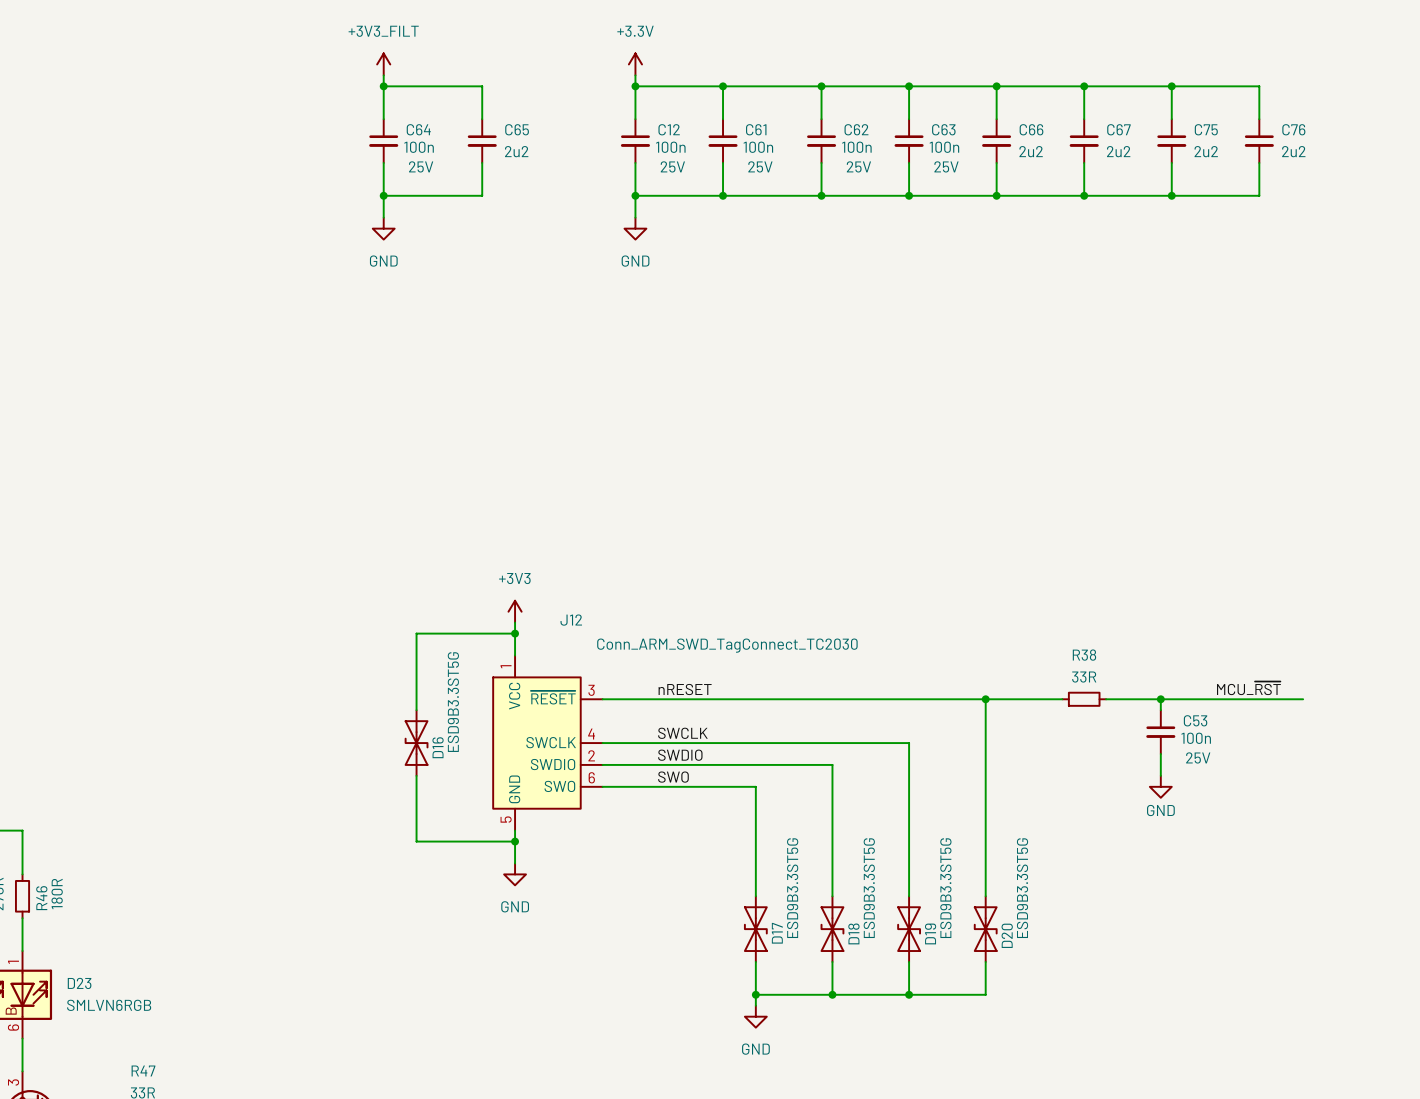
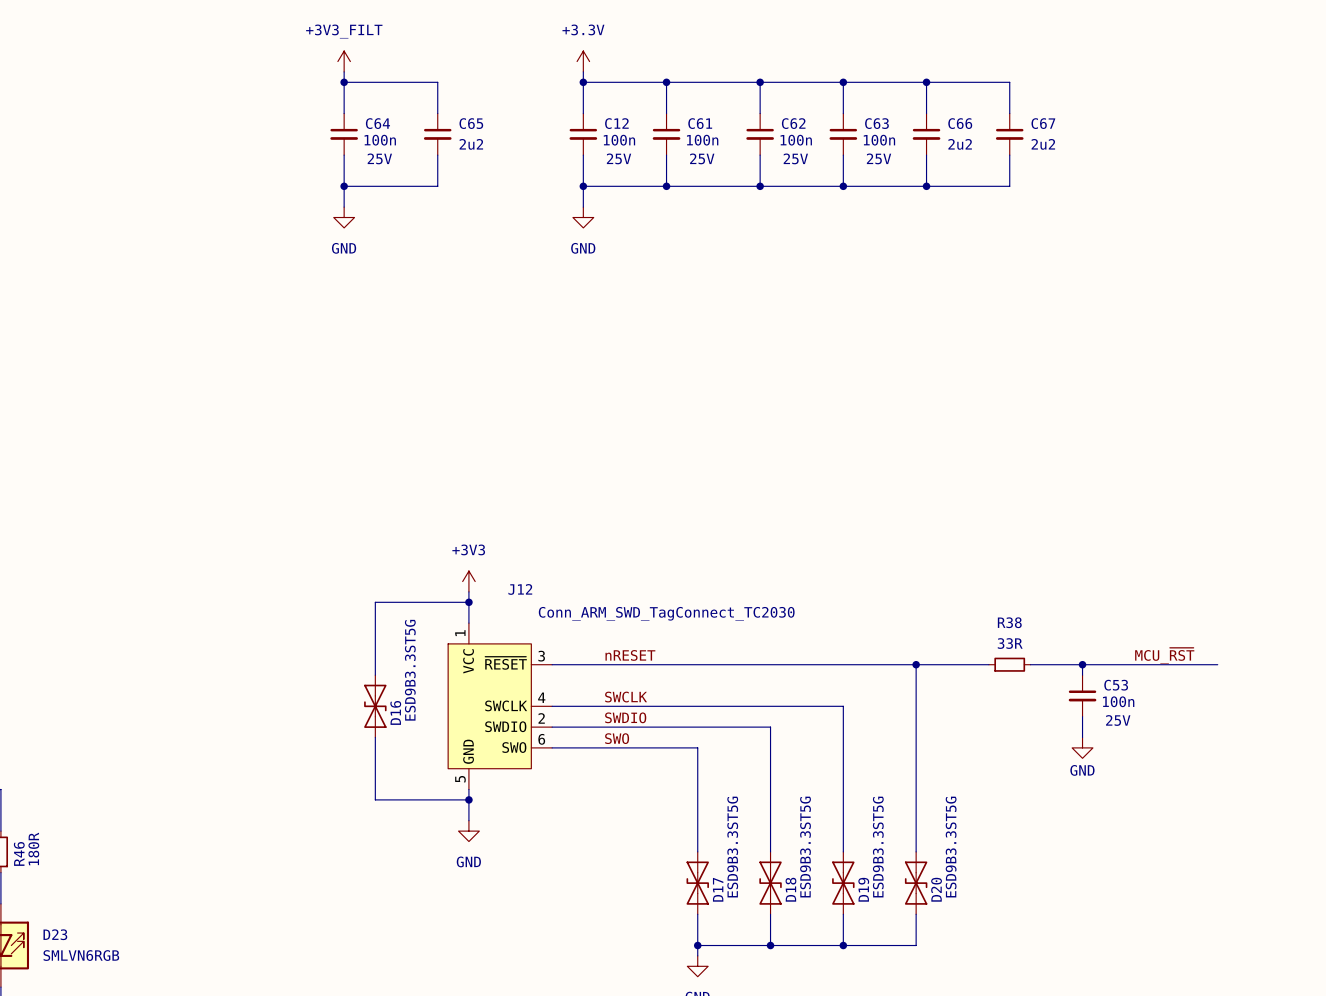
wire: (1084, 86) (1259, 86) (1259, 119) -> none
junction: (1084, 86) -> none
wire: (1171, 86) (1171, 119) -> none
junction: (1171, 86) -> none
C75: 2u2 (1171, 141) -> none
C76: 2u2 (1259, 141) -> none
wire: (1171, 162) (1171, 195) -> none
wire: (1259, 162) (1259, 195) (1084, 195) -> none
junction: (1084, 195) -> none
junction: (1171, 195) -> none

